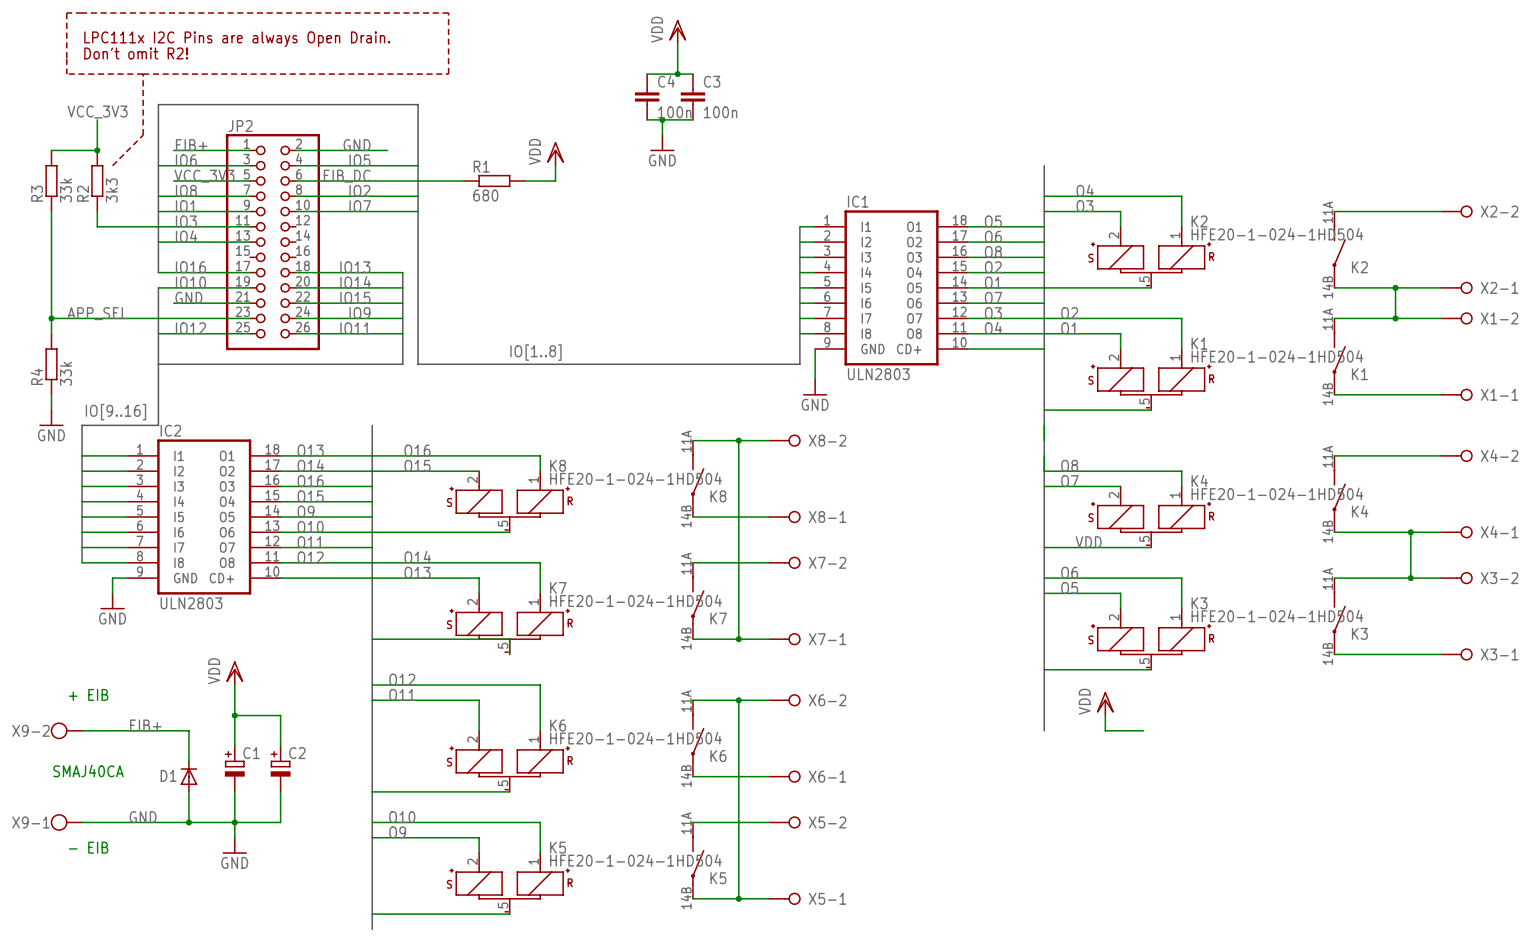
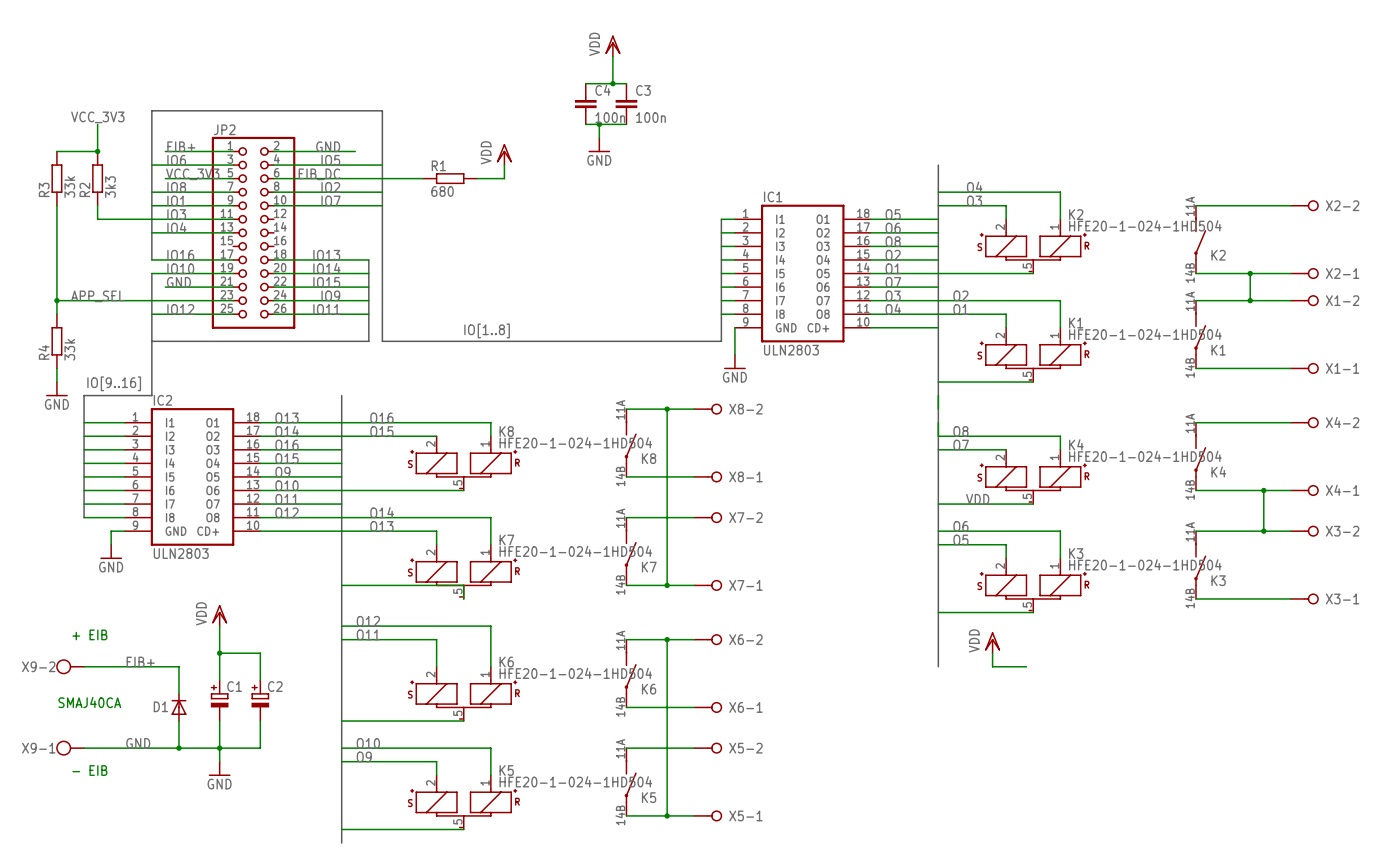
line: (66, 12) (448, 12) (448, 74) (66, 74) (66, 12) -> none
text: LPC111x I2C Pins are always Open Drain. (237, 39) -> none
text: Don't omit R2! (136, 53) -> none
line: (143, 74) (143, 135) (112, 165) -> none

